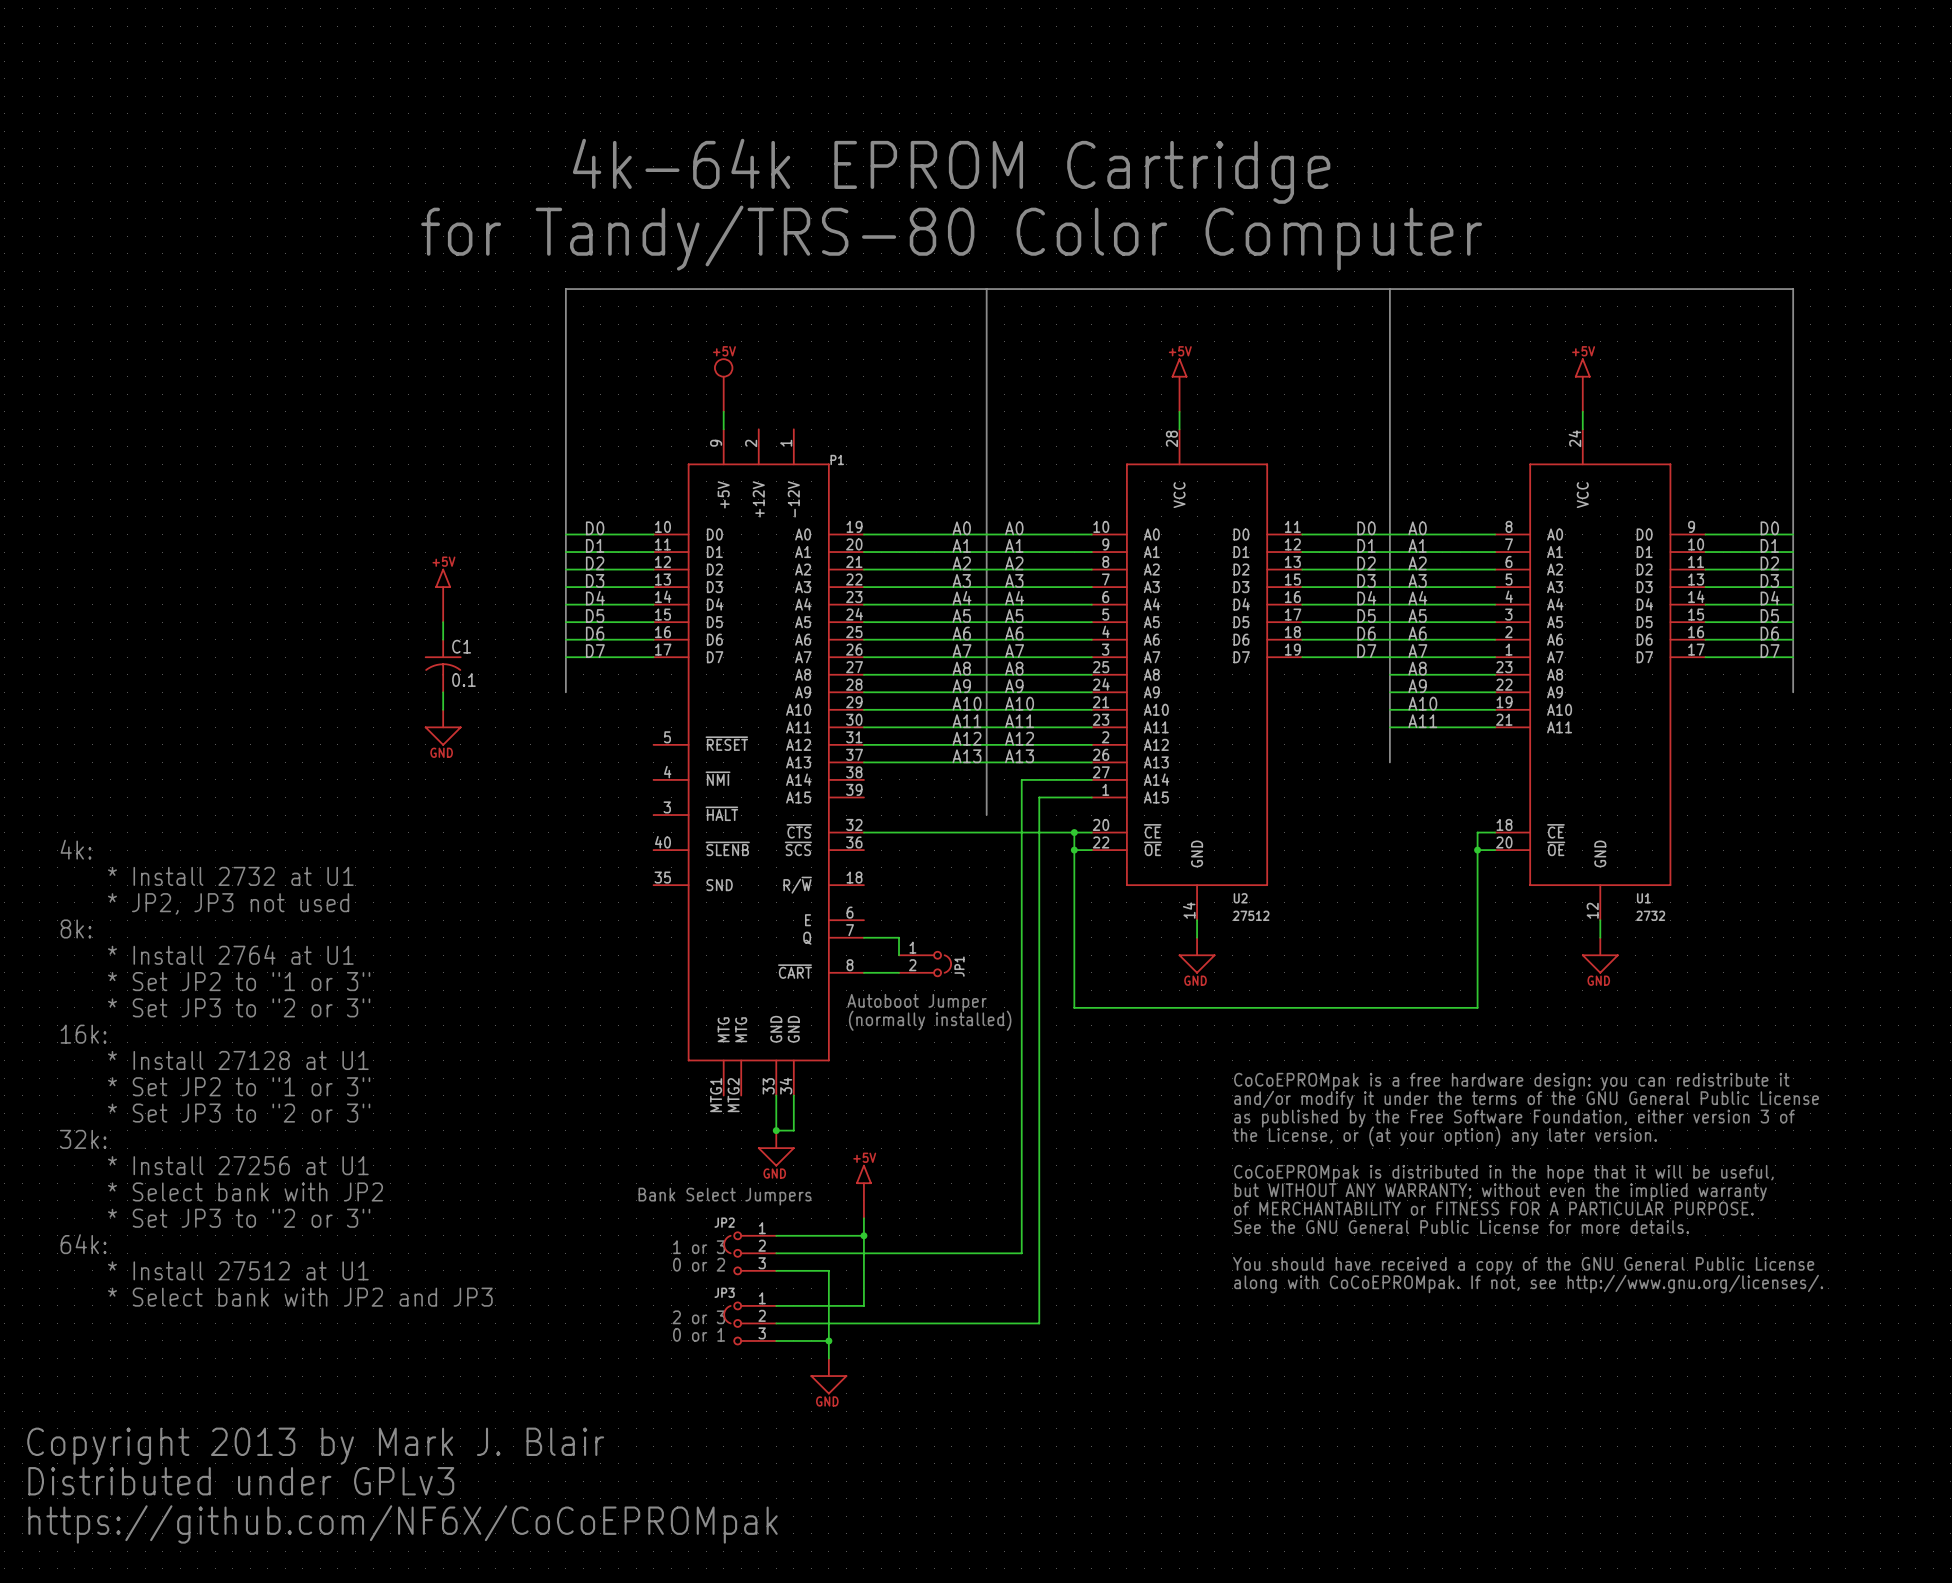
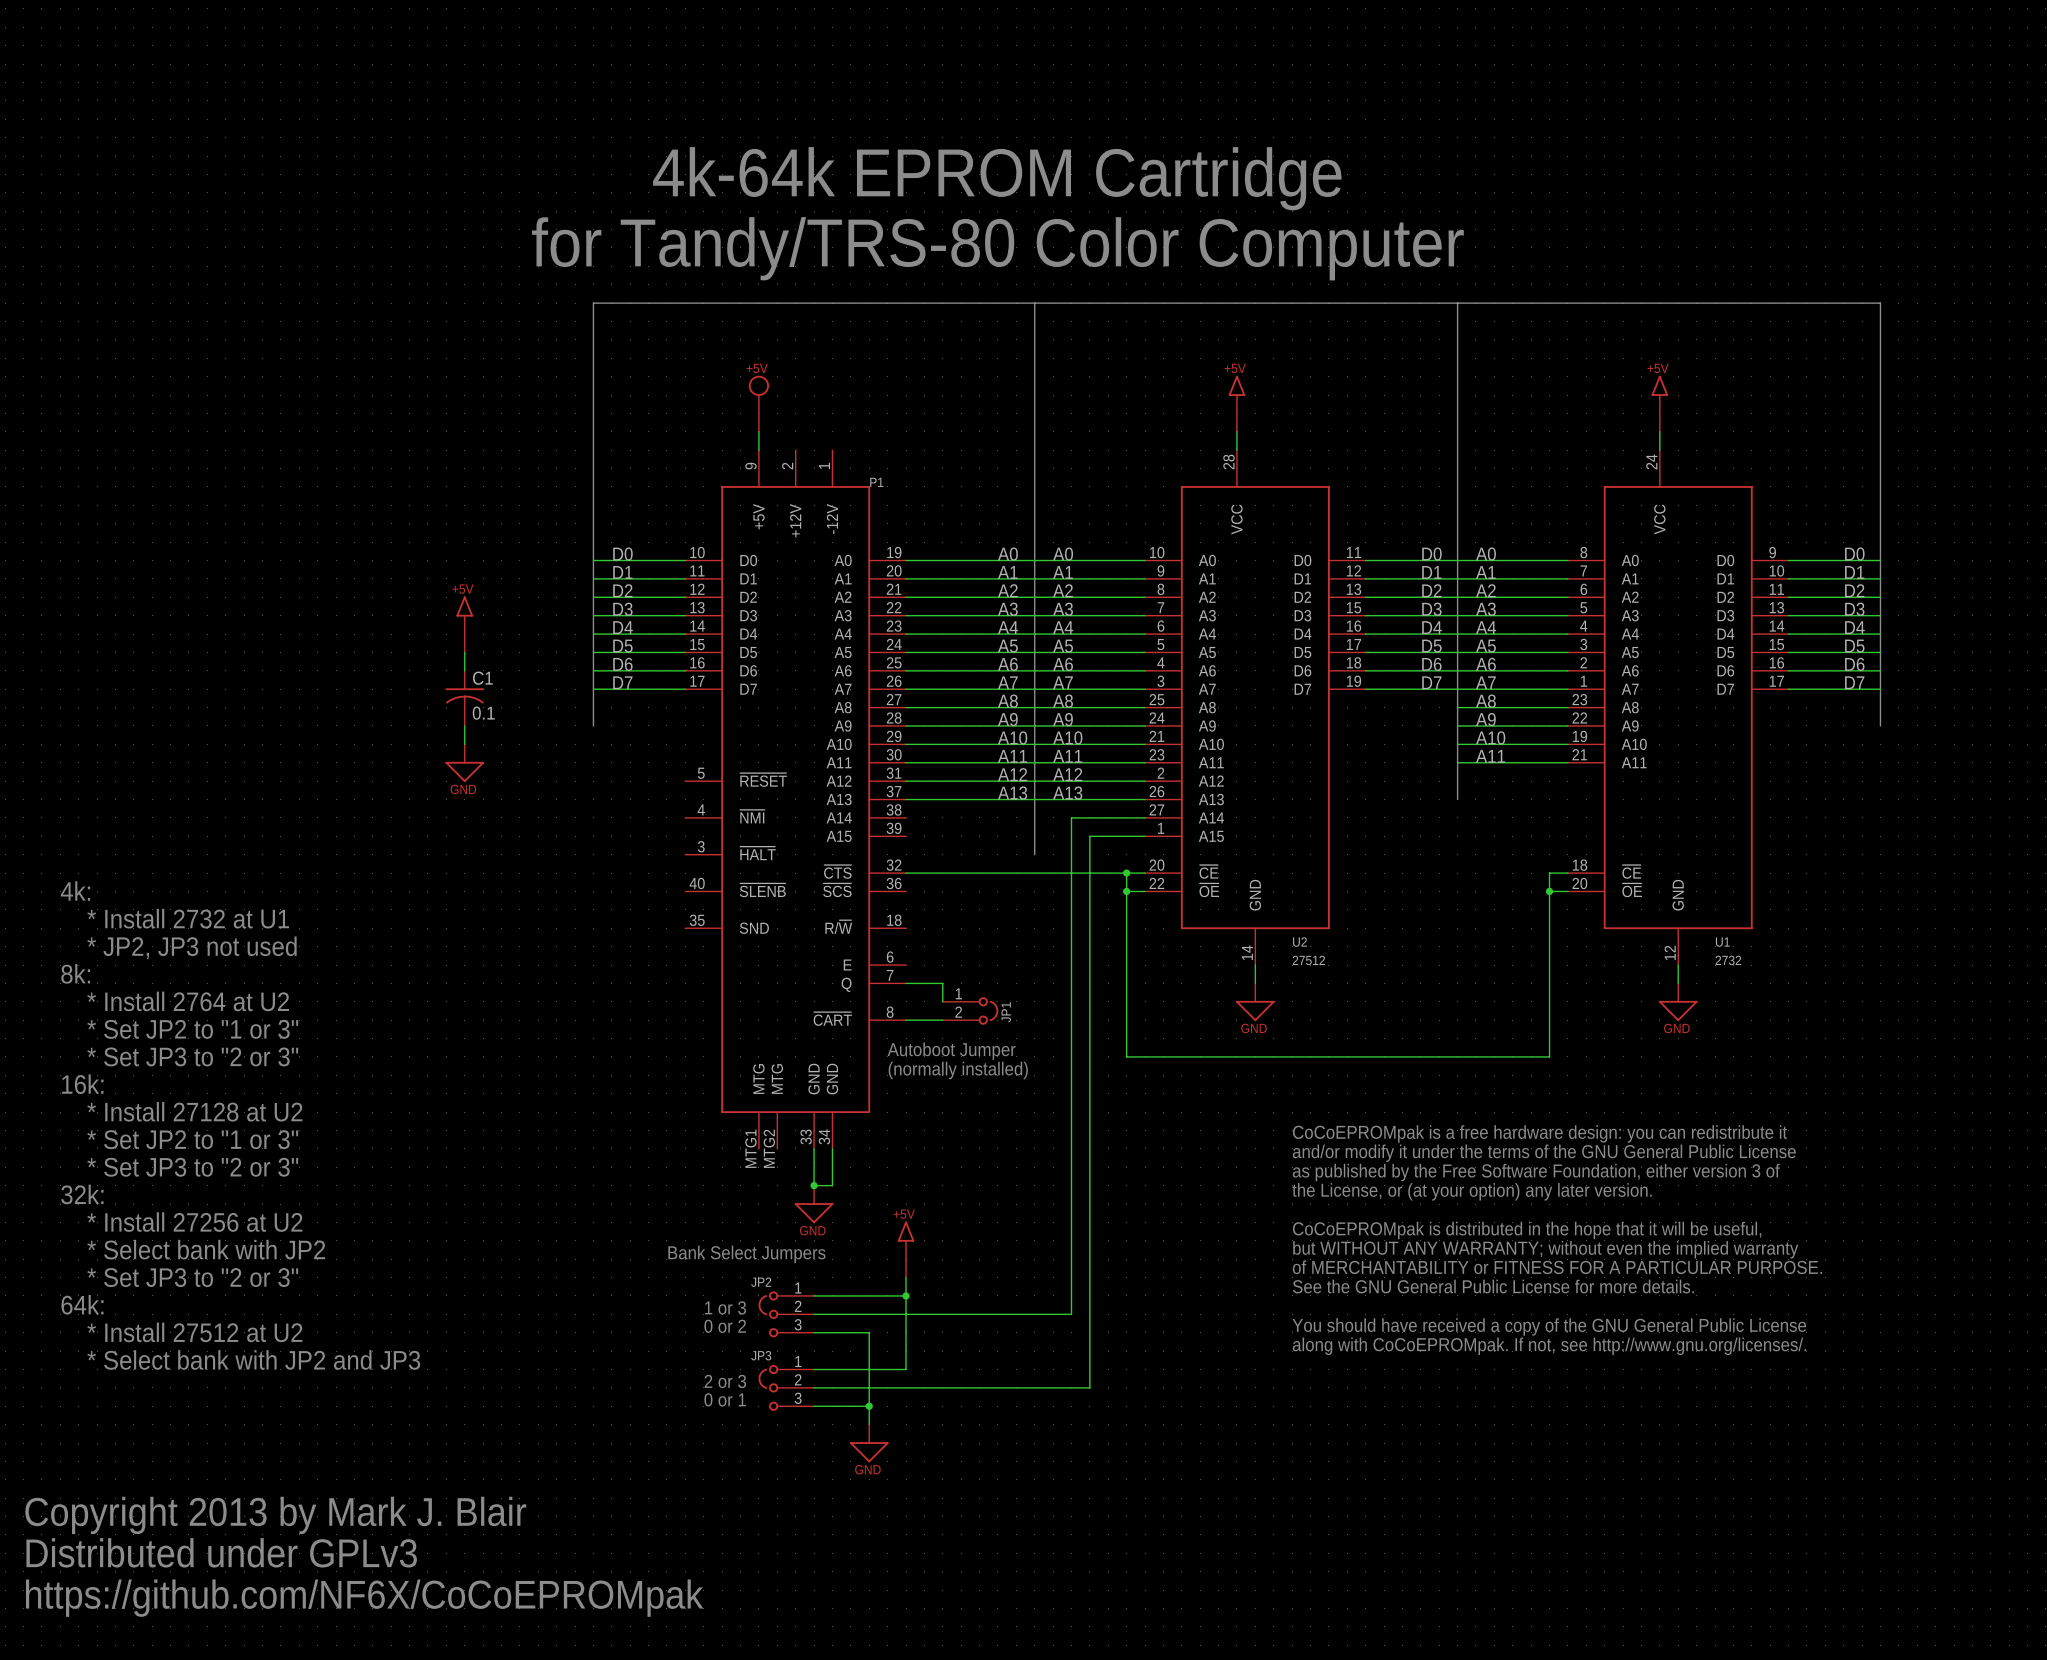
text: * Install 2764 at U1 (230, 954) -> * Install 2764 at U2 (188, 1001)
text: * Install 27128 at U1 (238, 1060) -> * Install 27128 at U2 (194, 1111)
text: * Install 27256 at U1 (238, 1165) -> * Install 27256 at U2 (194, 1222)
text: * Install 27512 at U1 (238, 1270) -> * Install 27512 at U2 (194, 1332)

